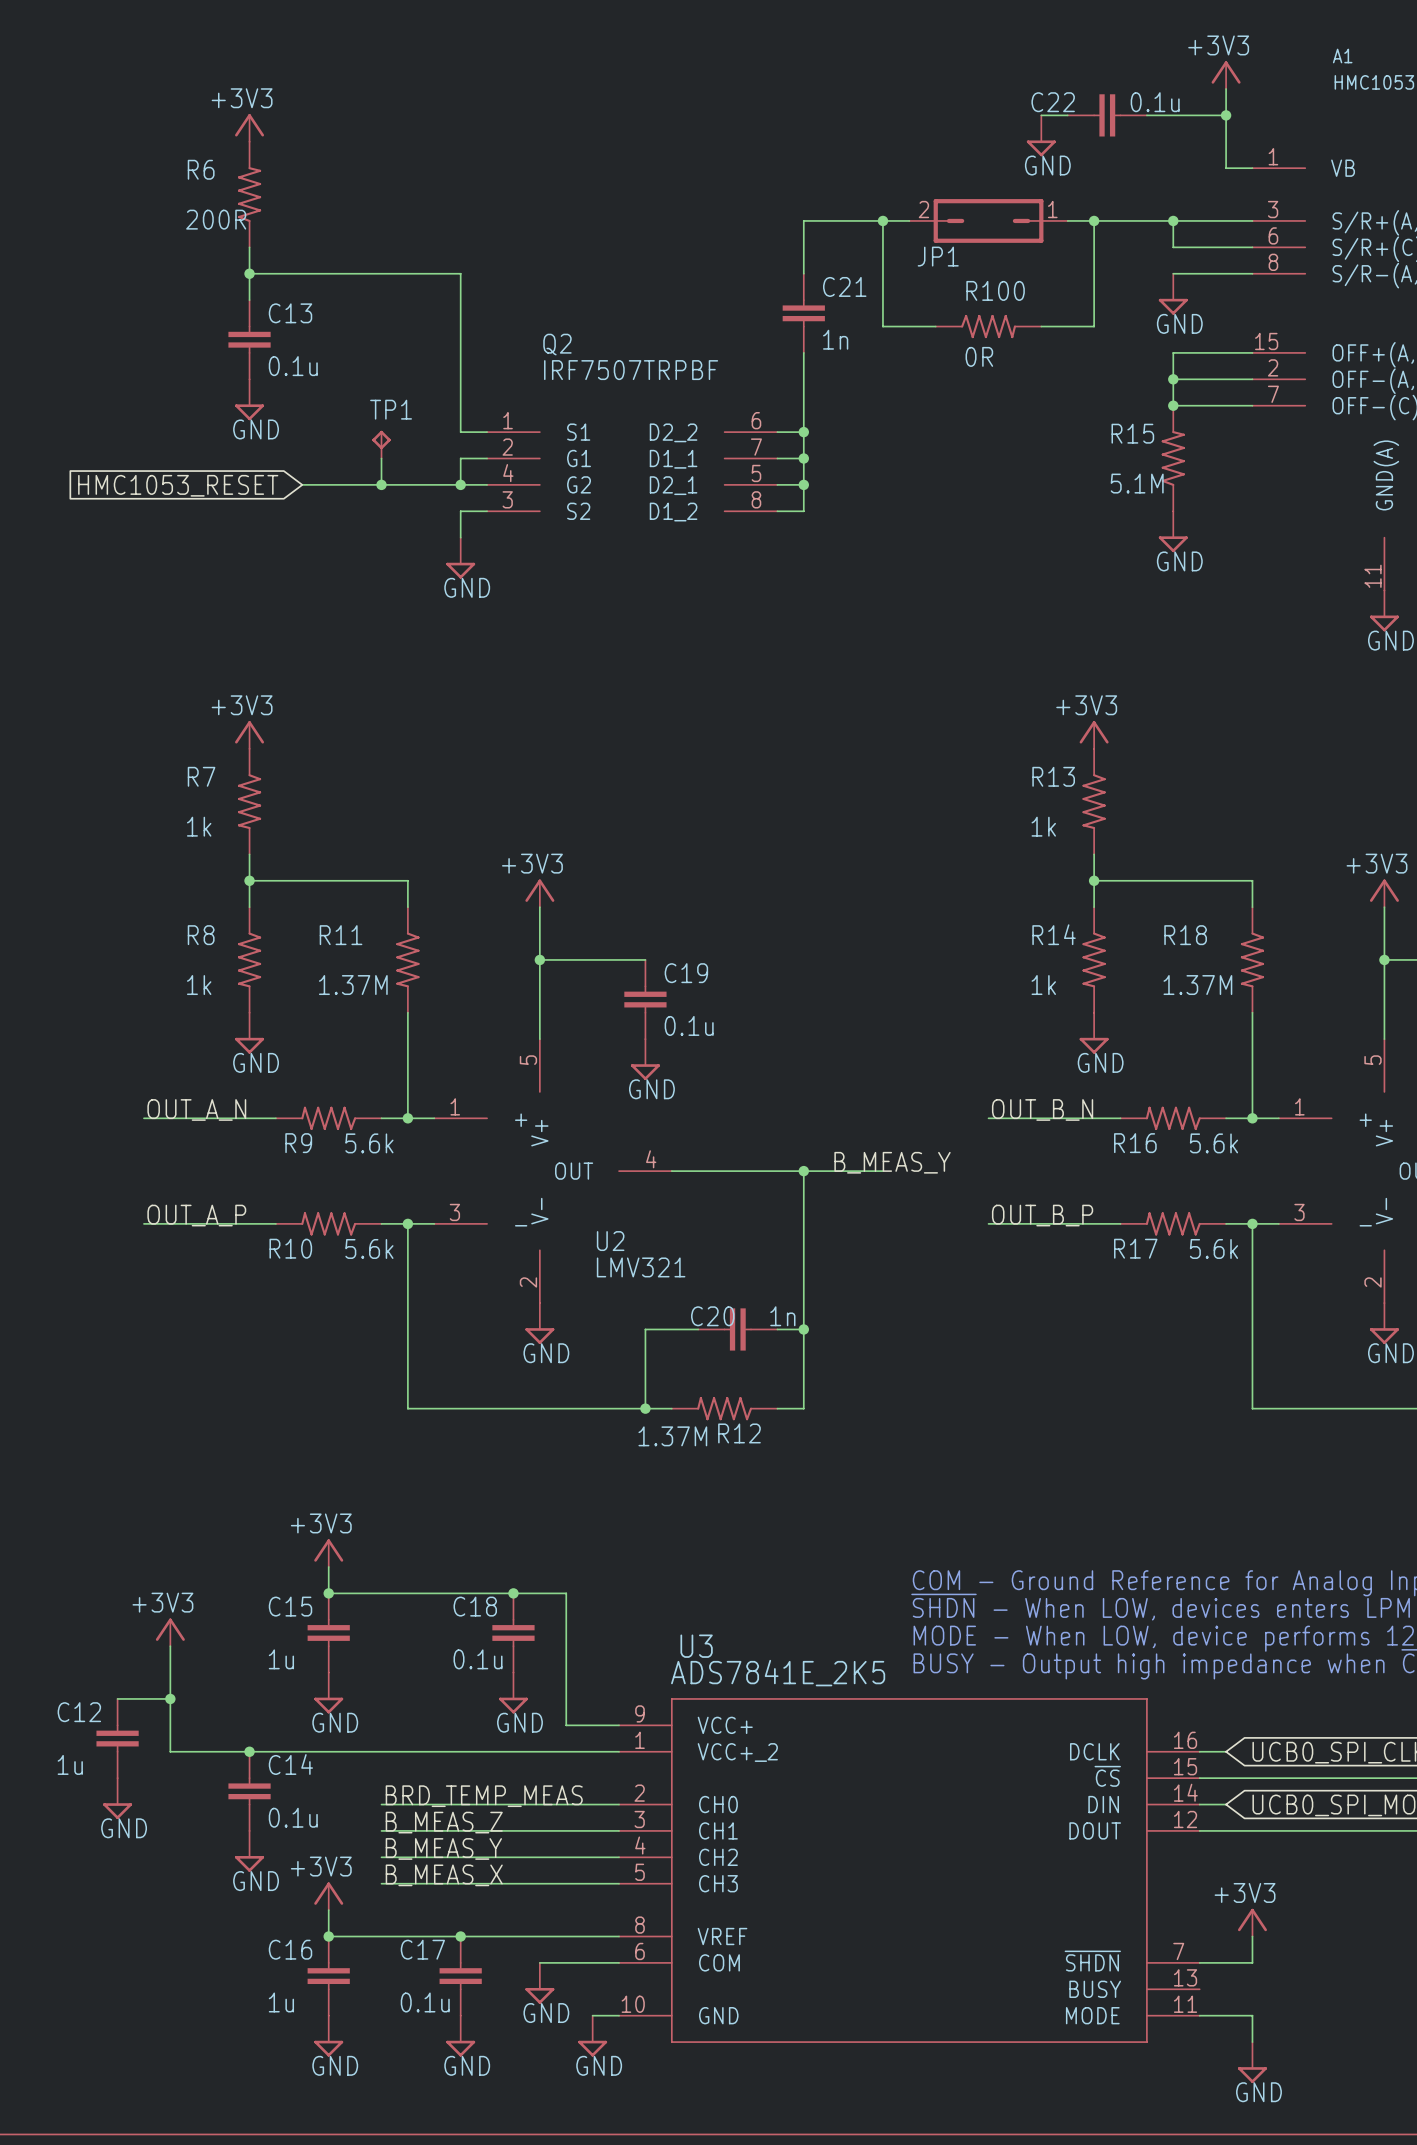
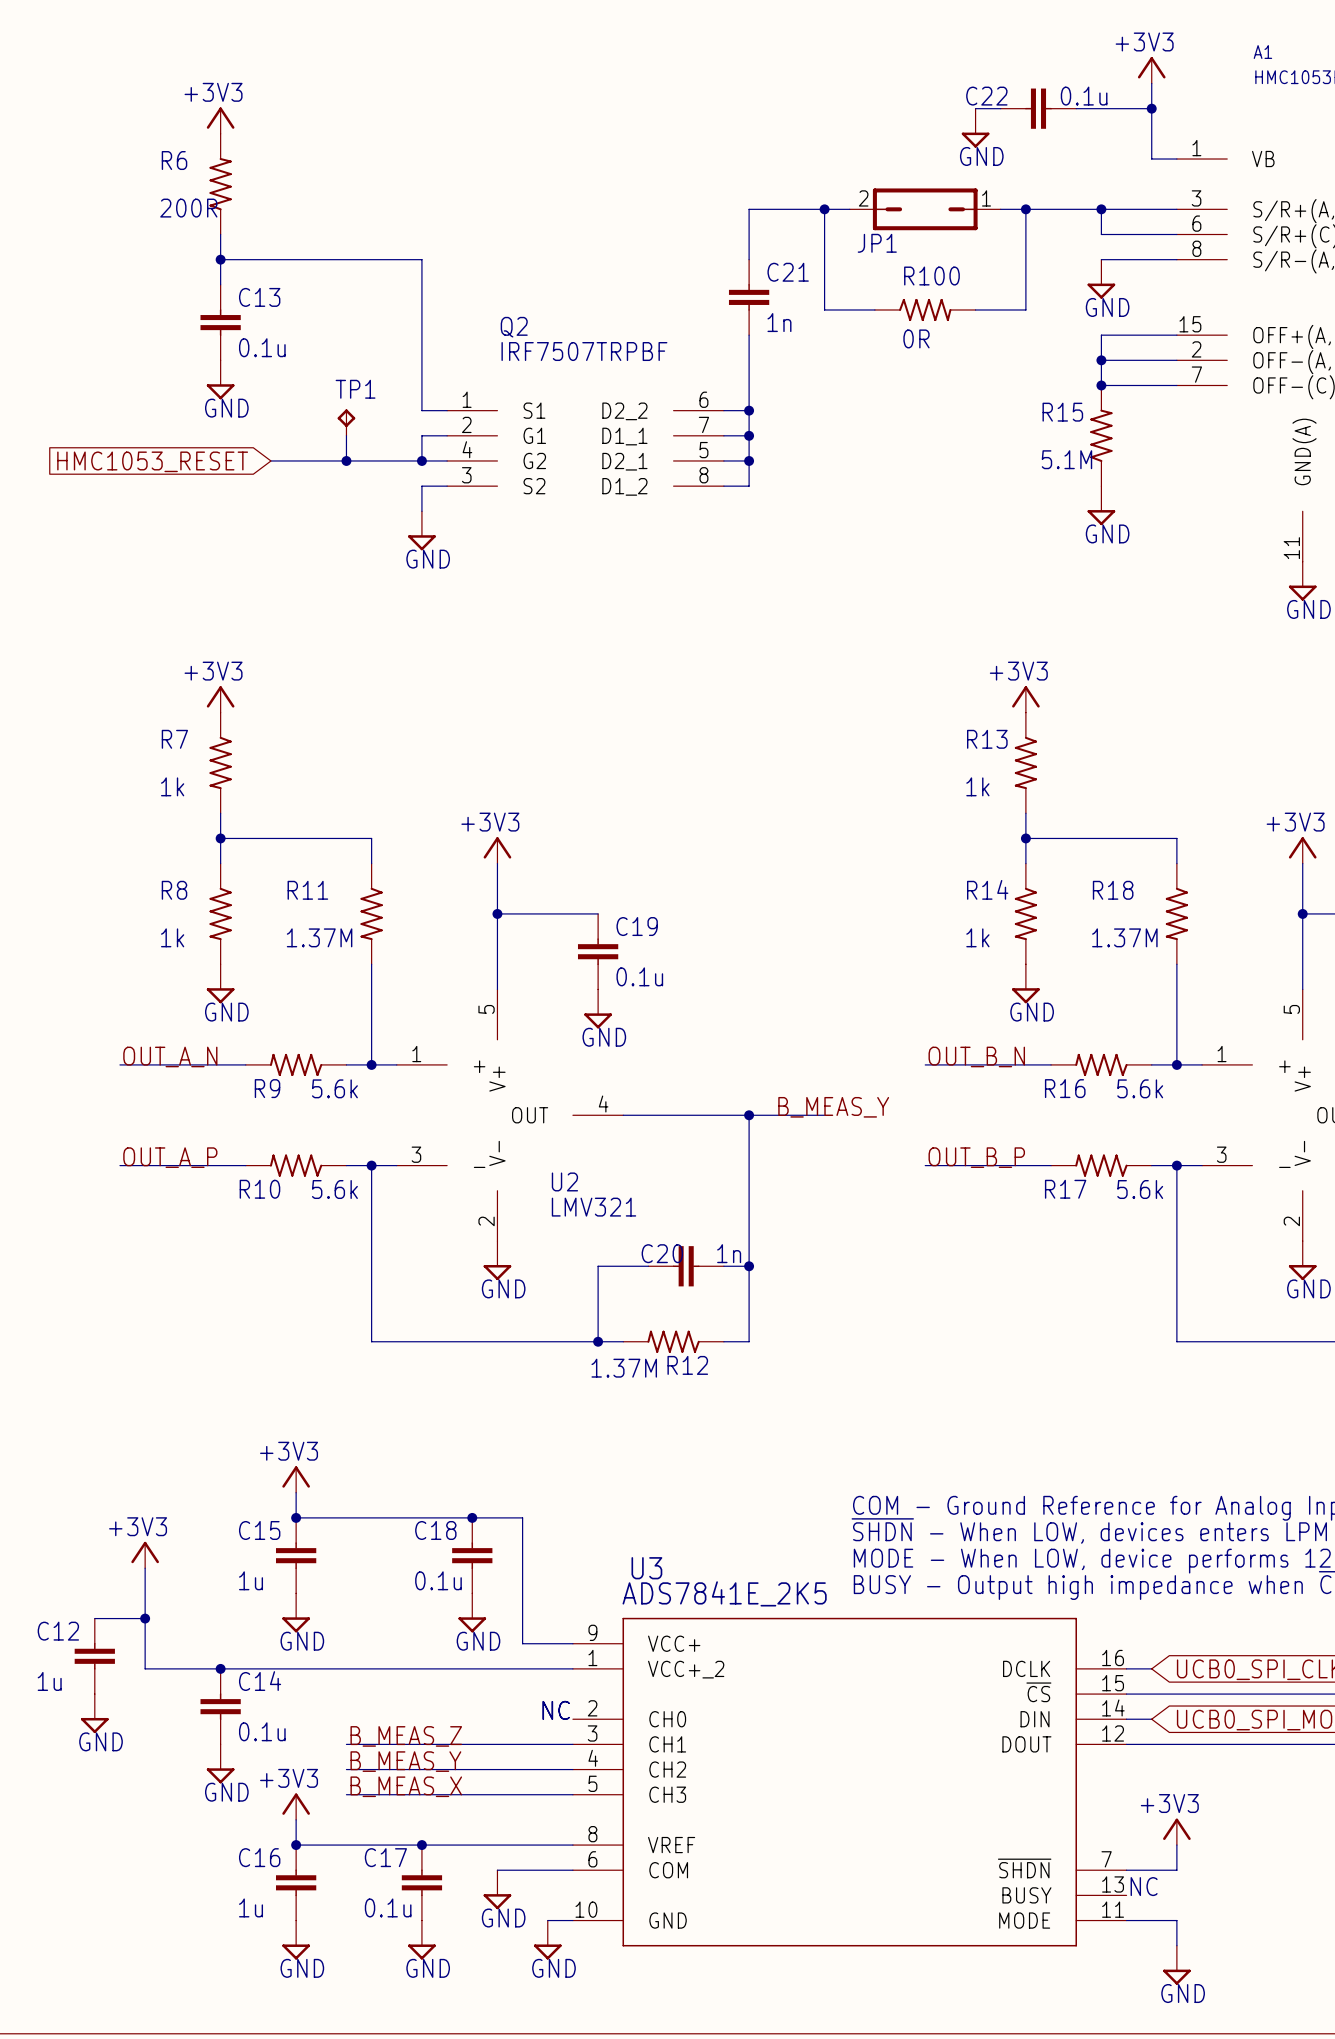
text: none -> NC (556, 1710)
label: BRD_TEMP_MEAS (484, 1796) -> none
wire: (381, 1804) (619, 1804) -> none
text: none -> NC (1144, 1886)

